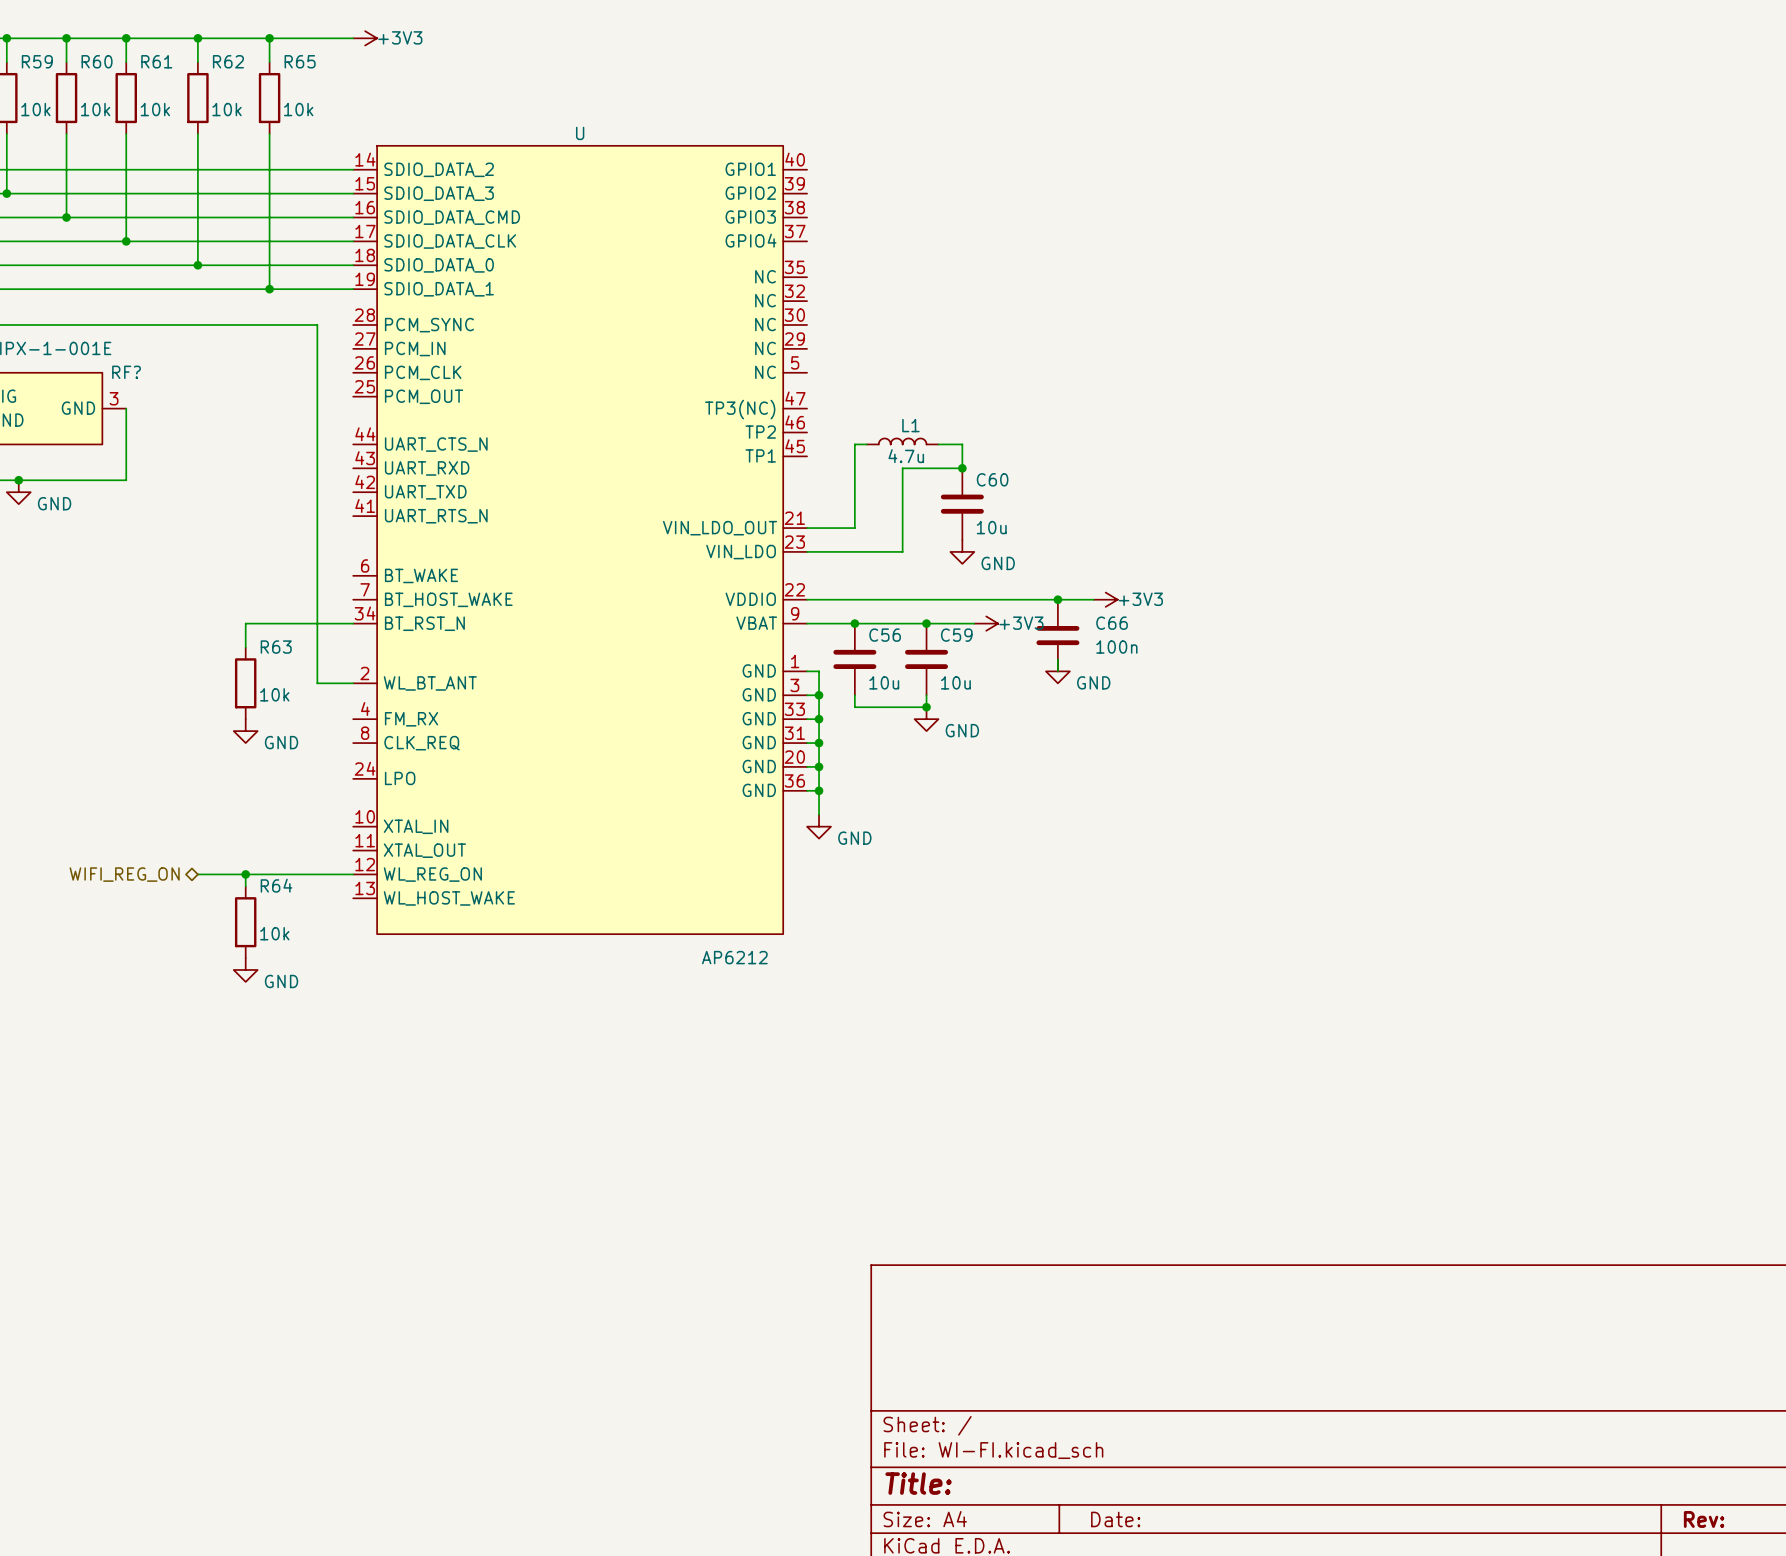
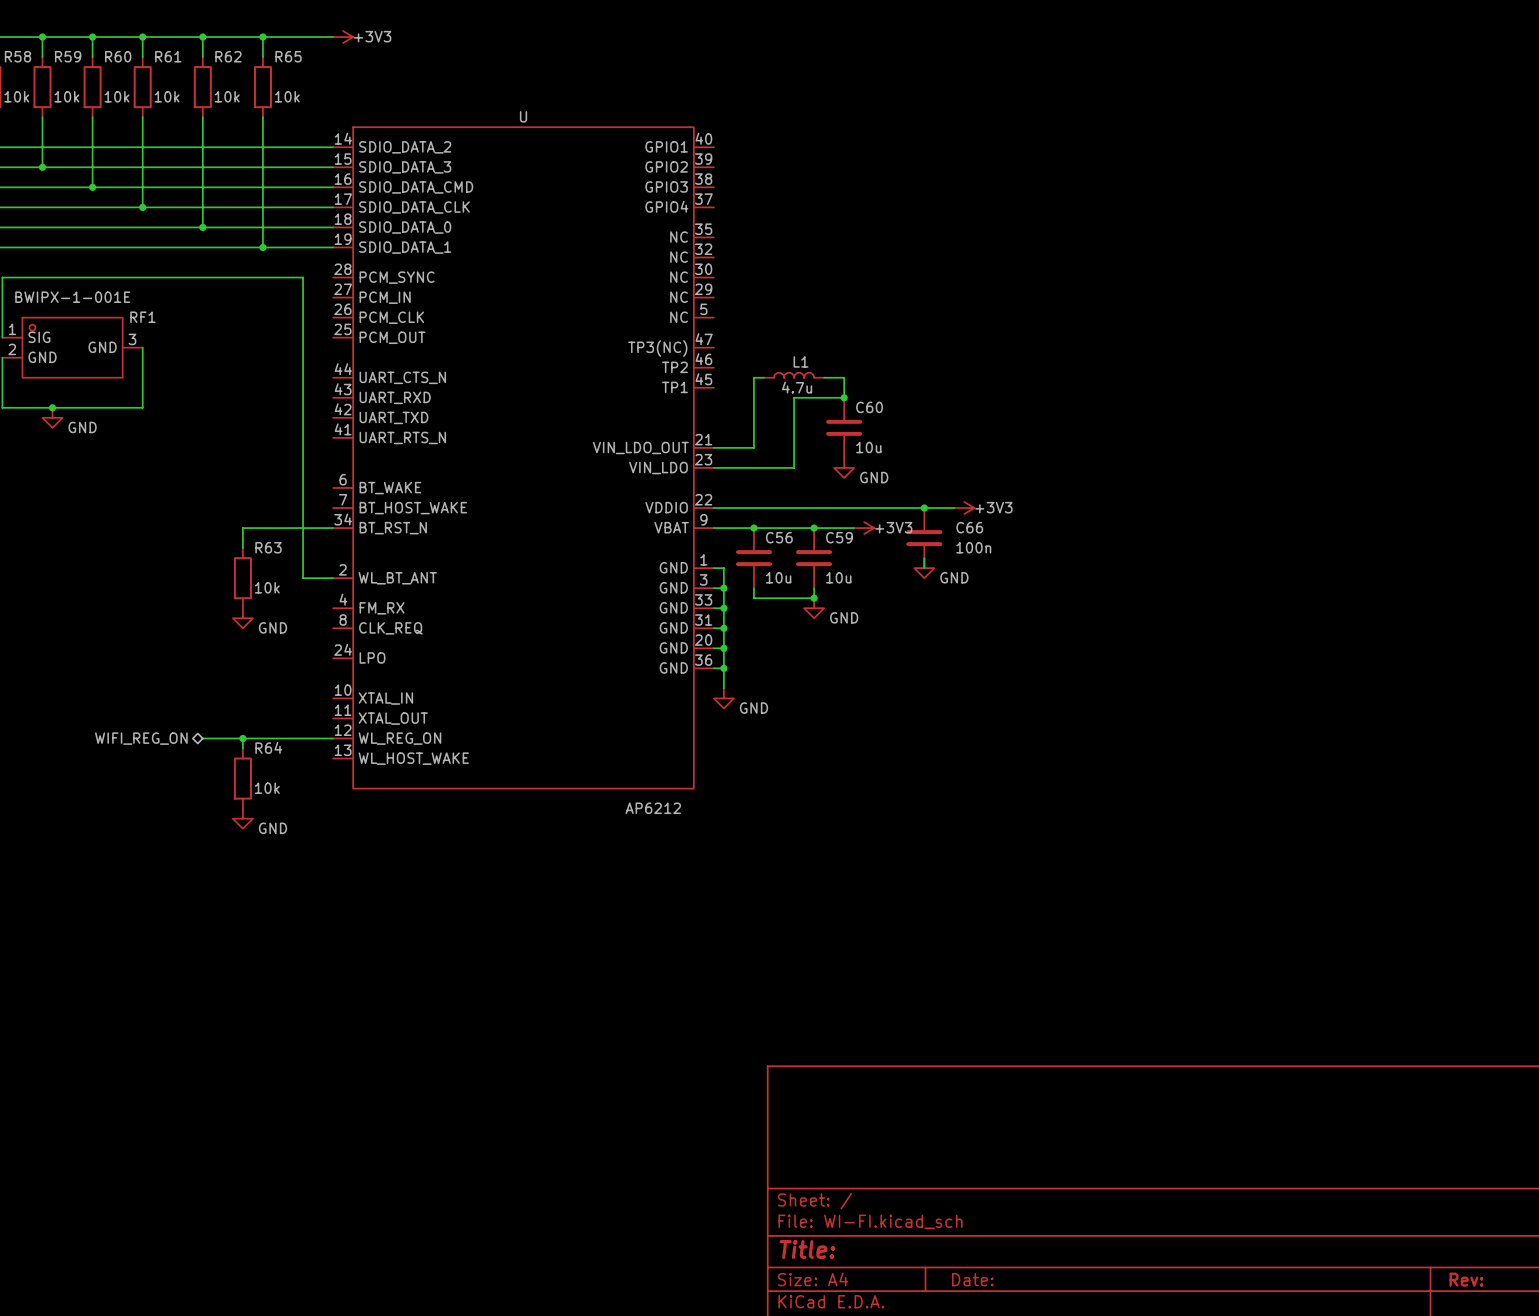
RF? name: RF? (126, 372) -> RF1 (142, 317)

